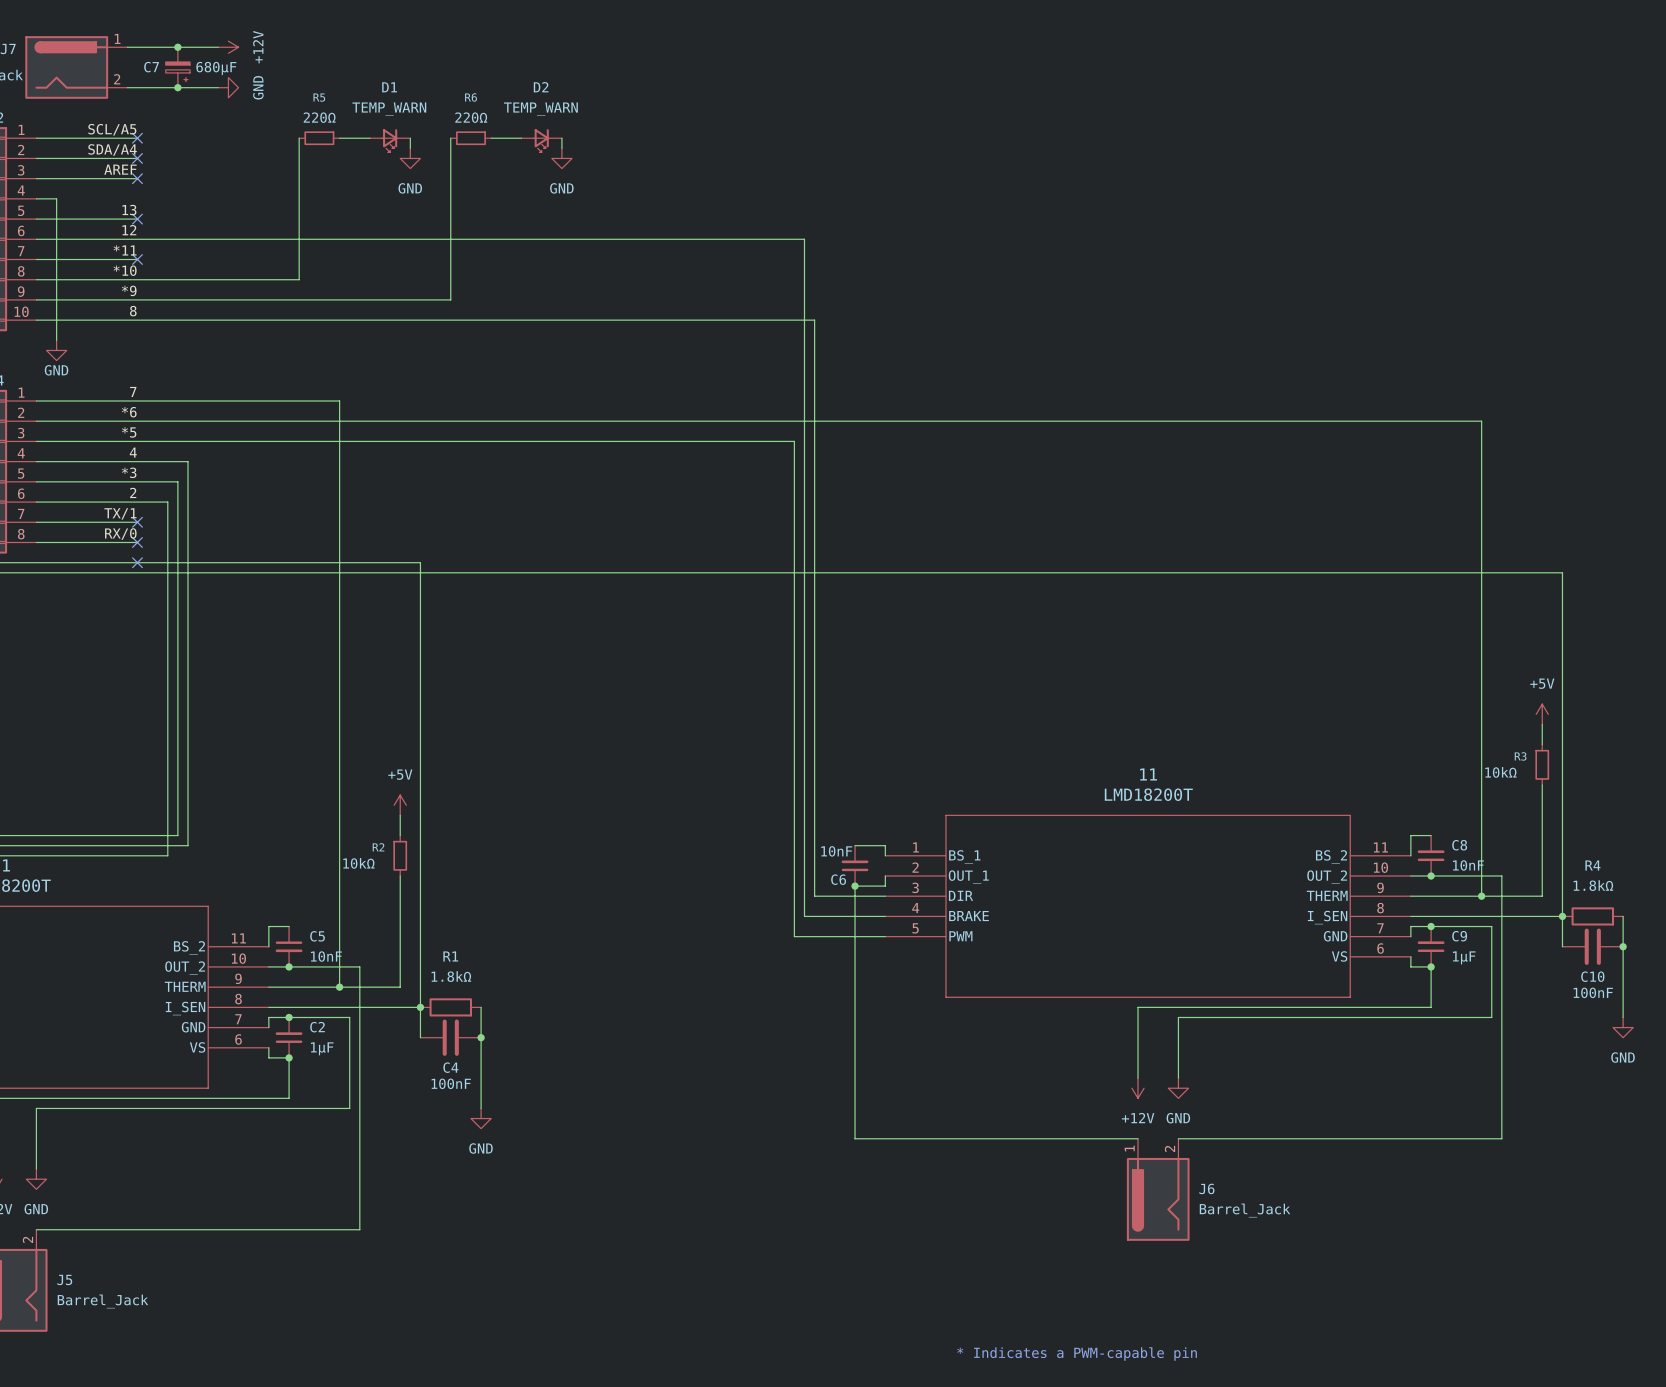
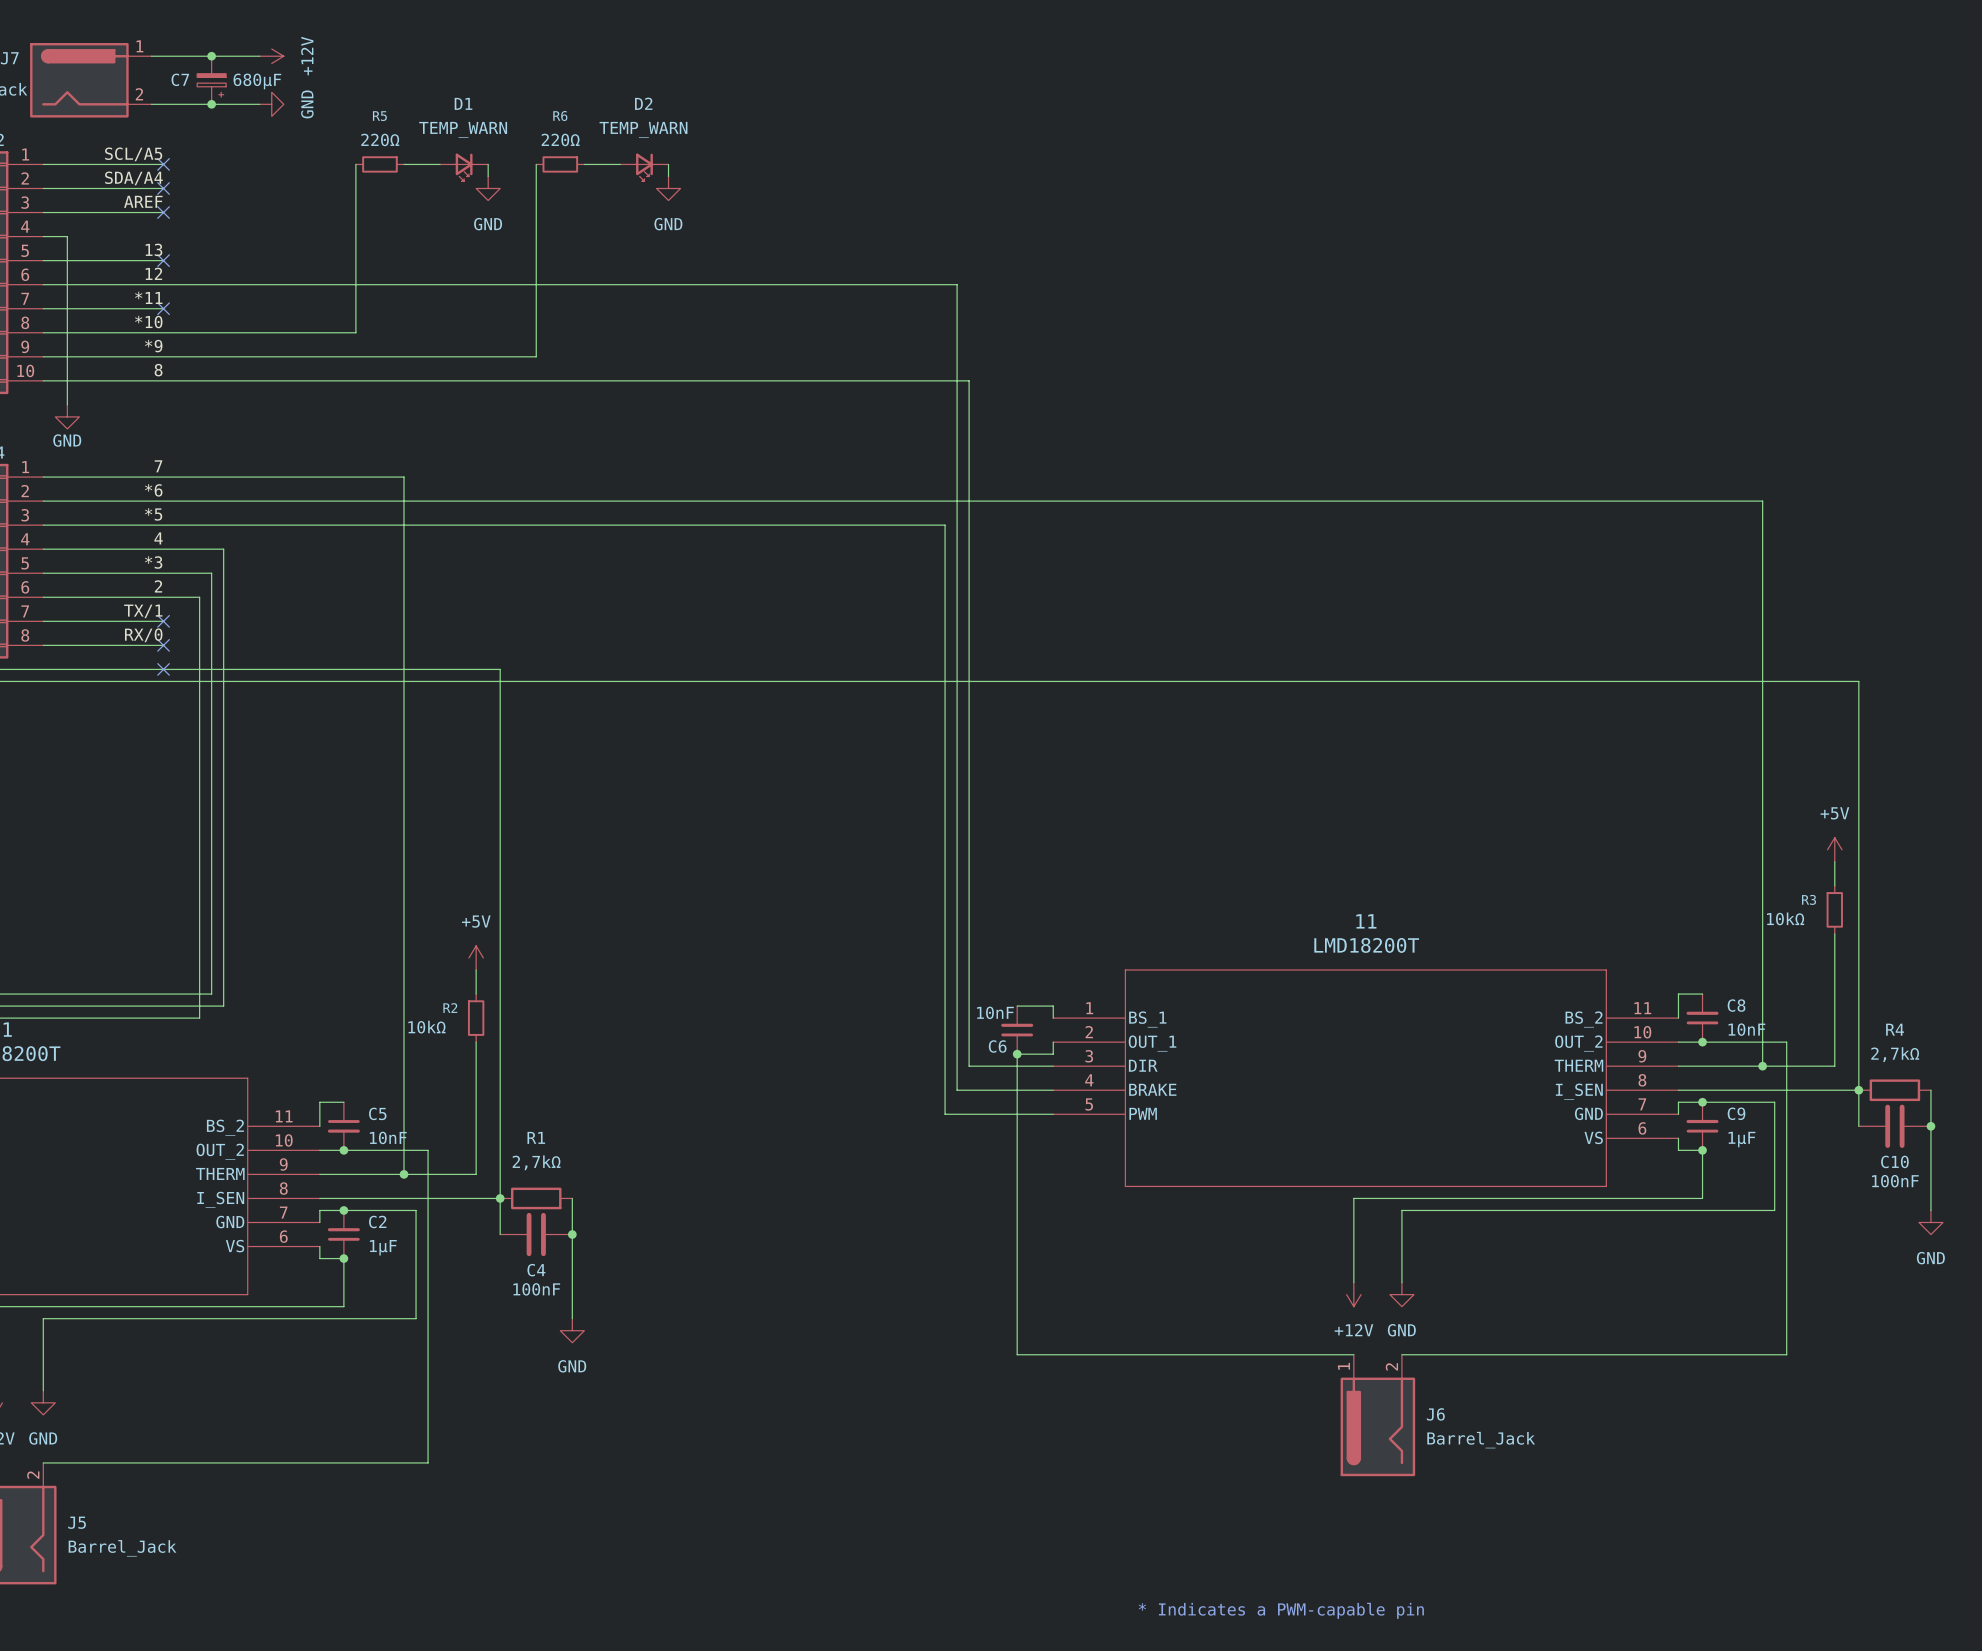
R4 value: 1.8kΩ (1593, 885) -> 2,7kΩ (1895, 1054)
R1 value: 1.8kΩ (451, 976) -> 2,7kΩ (536, 1162)

